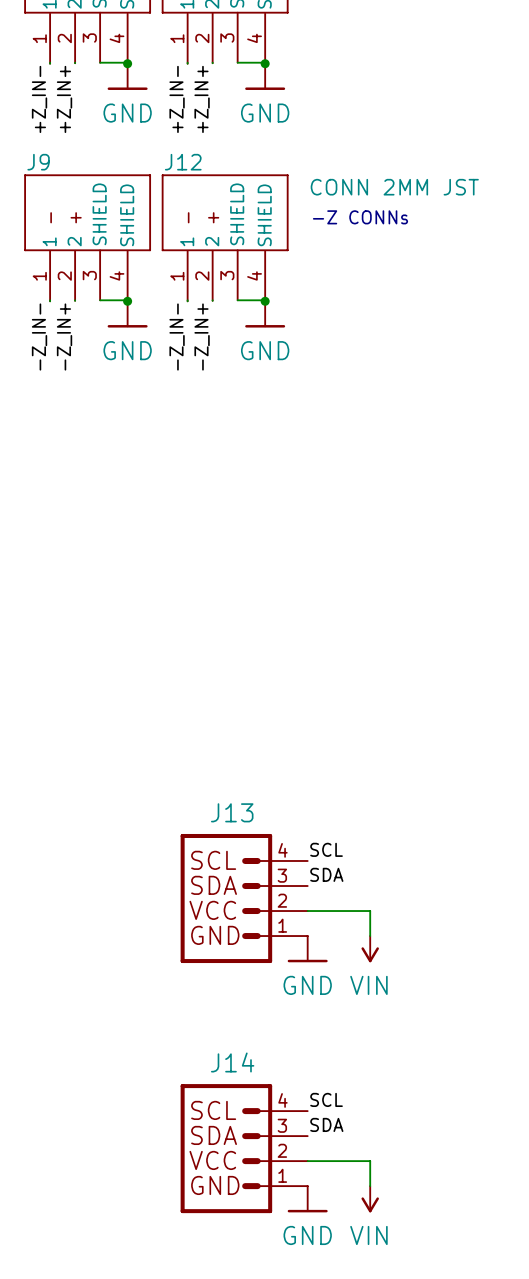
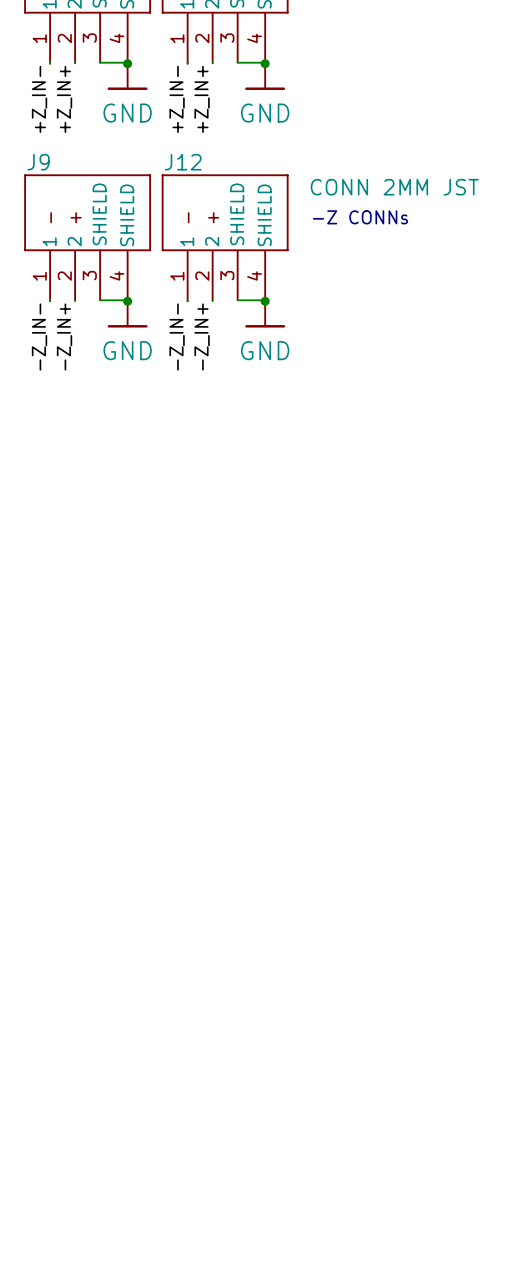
label: SCL (326, 849) -> none
label: SDA (326, 874) -> none
J13: (244, 898) -> none
wire: (307, 911) (370, 911) (370, 936) -> none
power symbol: GND (307, 949) -> none
power symbol: VIN (370, 949) -> none
label: SCL (326, 1099) -> none
label: SDA (326, 1124) -> none
J14: (244, 1148) -> none
wire: (307, 1161) (370, 1161) (370, 1186) -> none
power symbol: GND (307, 1199) -> none
power symbol: VIN (370, 1199) -> none

